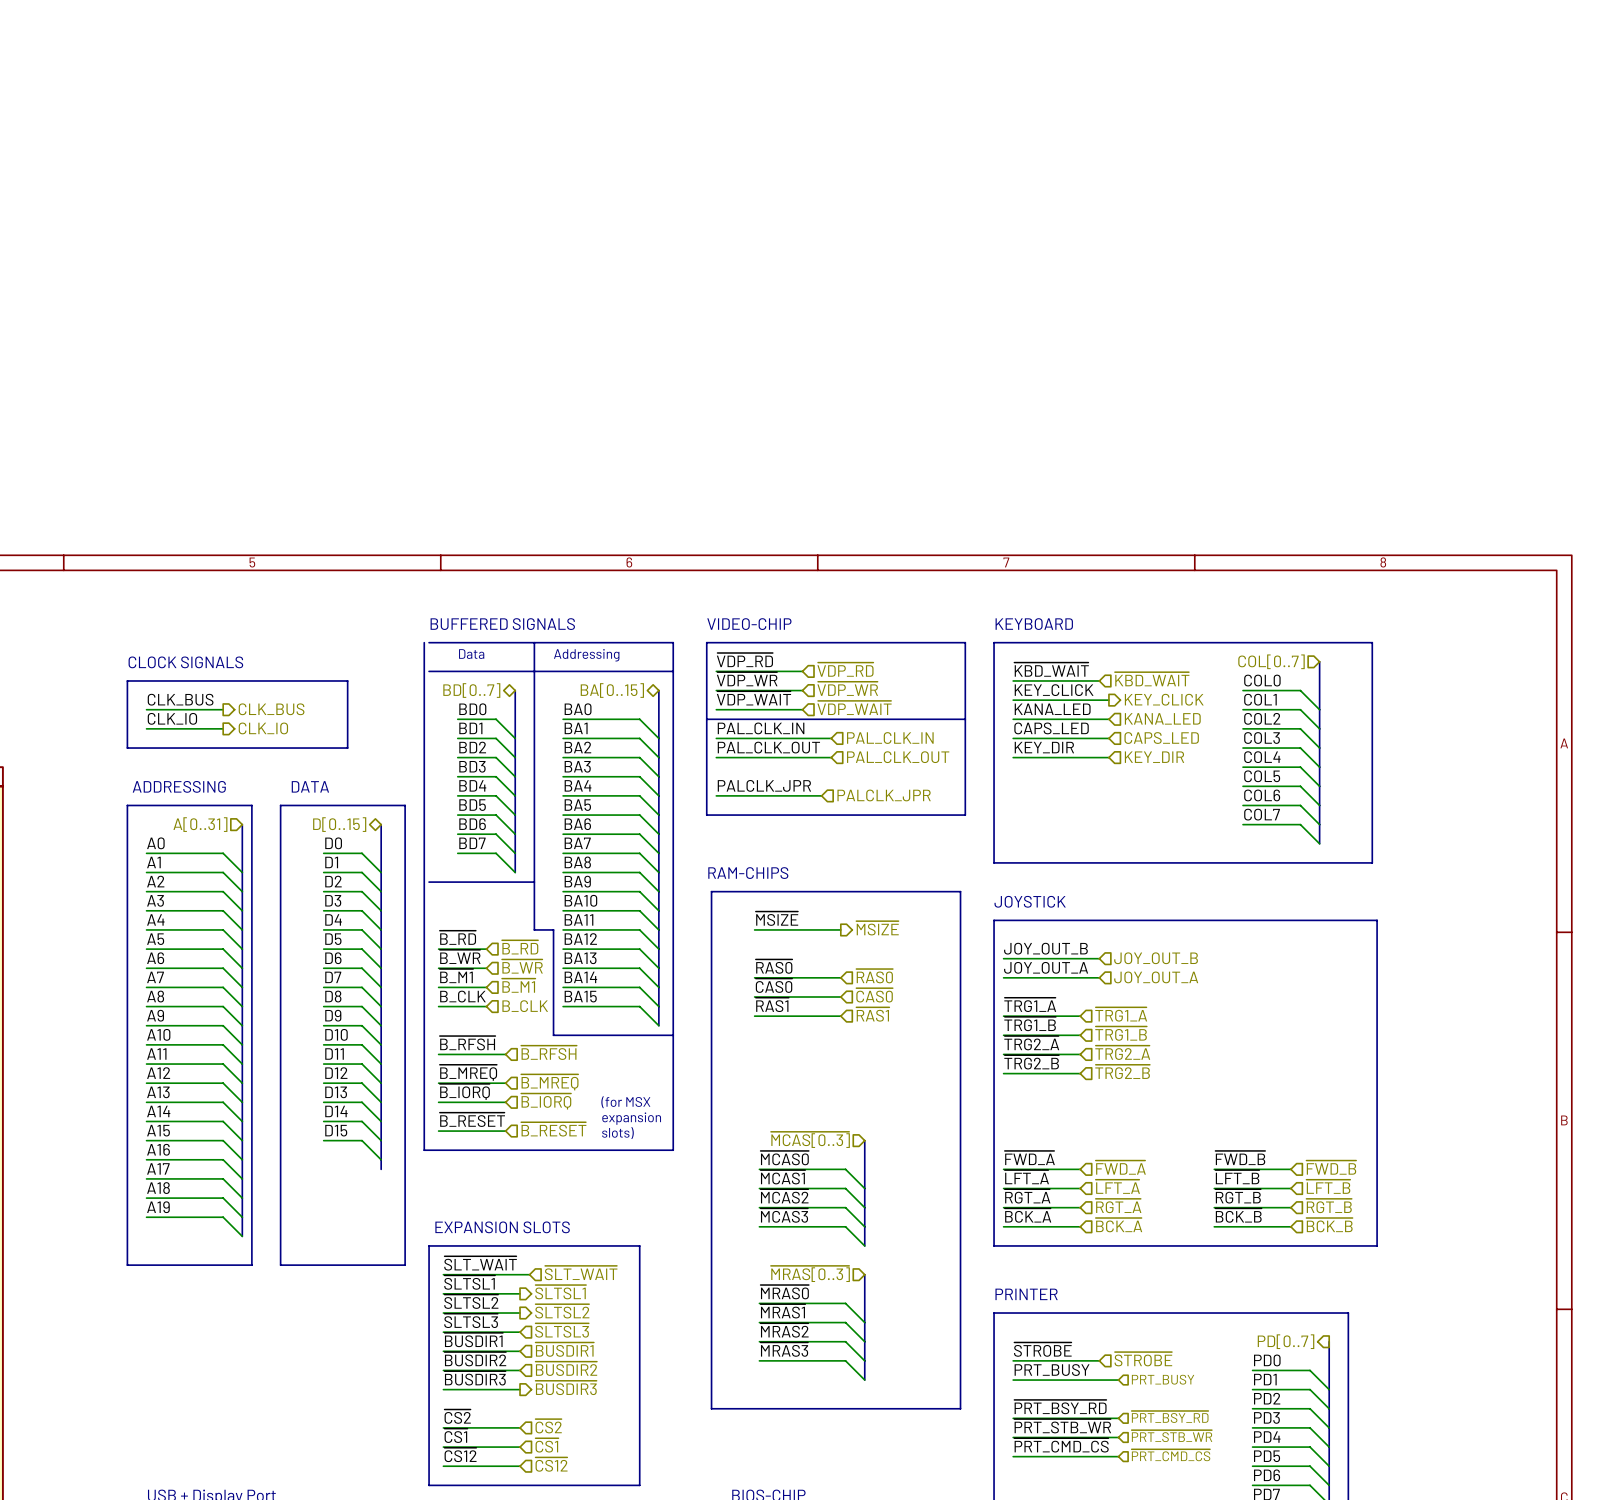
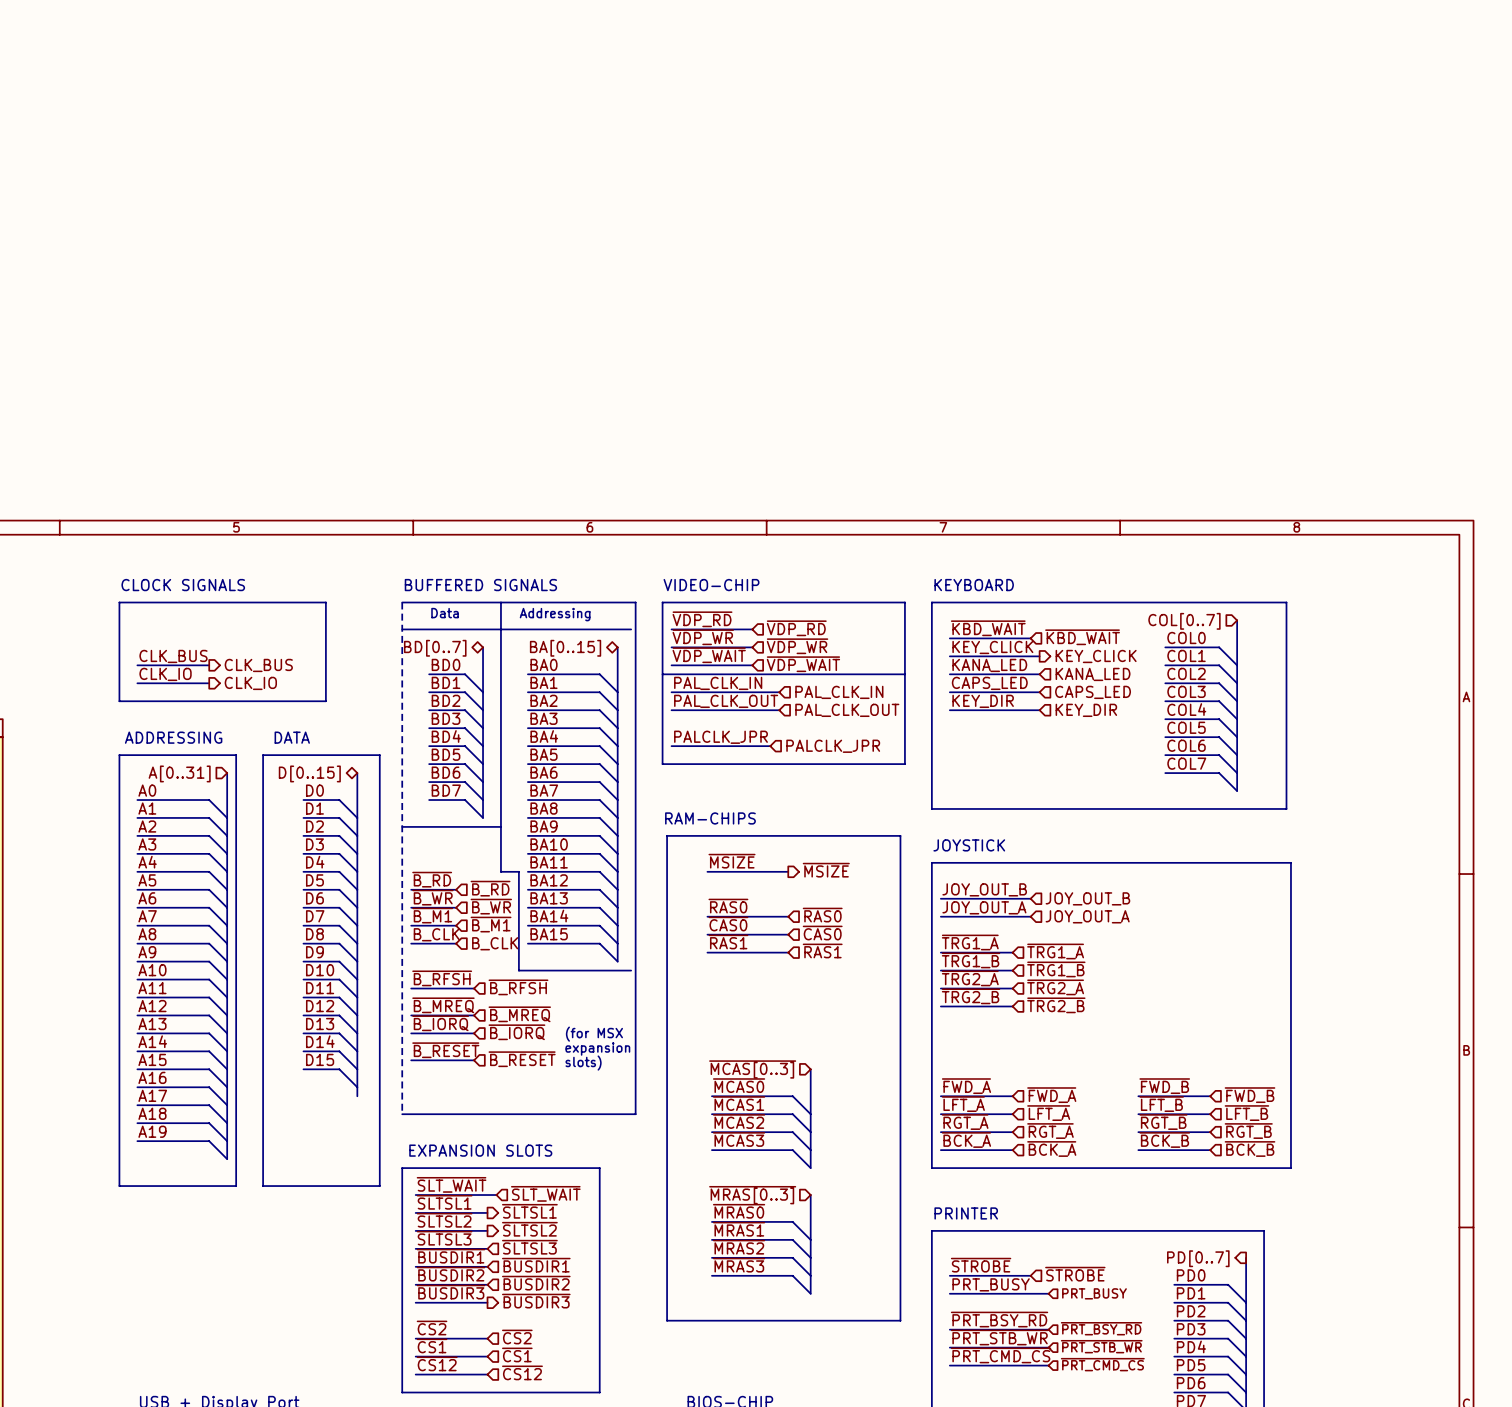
line: (424, 642) (424, 1150) (673, 1150) (673, 642) -> (402, 602) (402, 1114) (635, 1114) (635, 602) (631, 602)
text position: CLOCK SIGNALS (185, 662) -> CLOCK SIGNALS (183, 585)
line: (127, 680) (347, 680) -> (119, 638) (119, 602) (325, 602) (325, 638)

